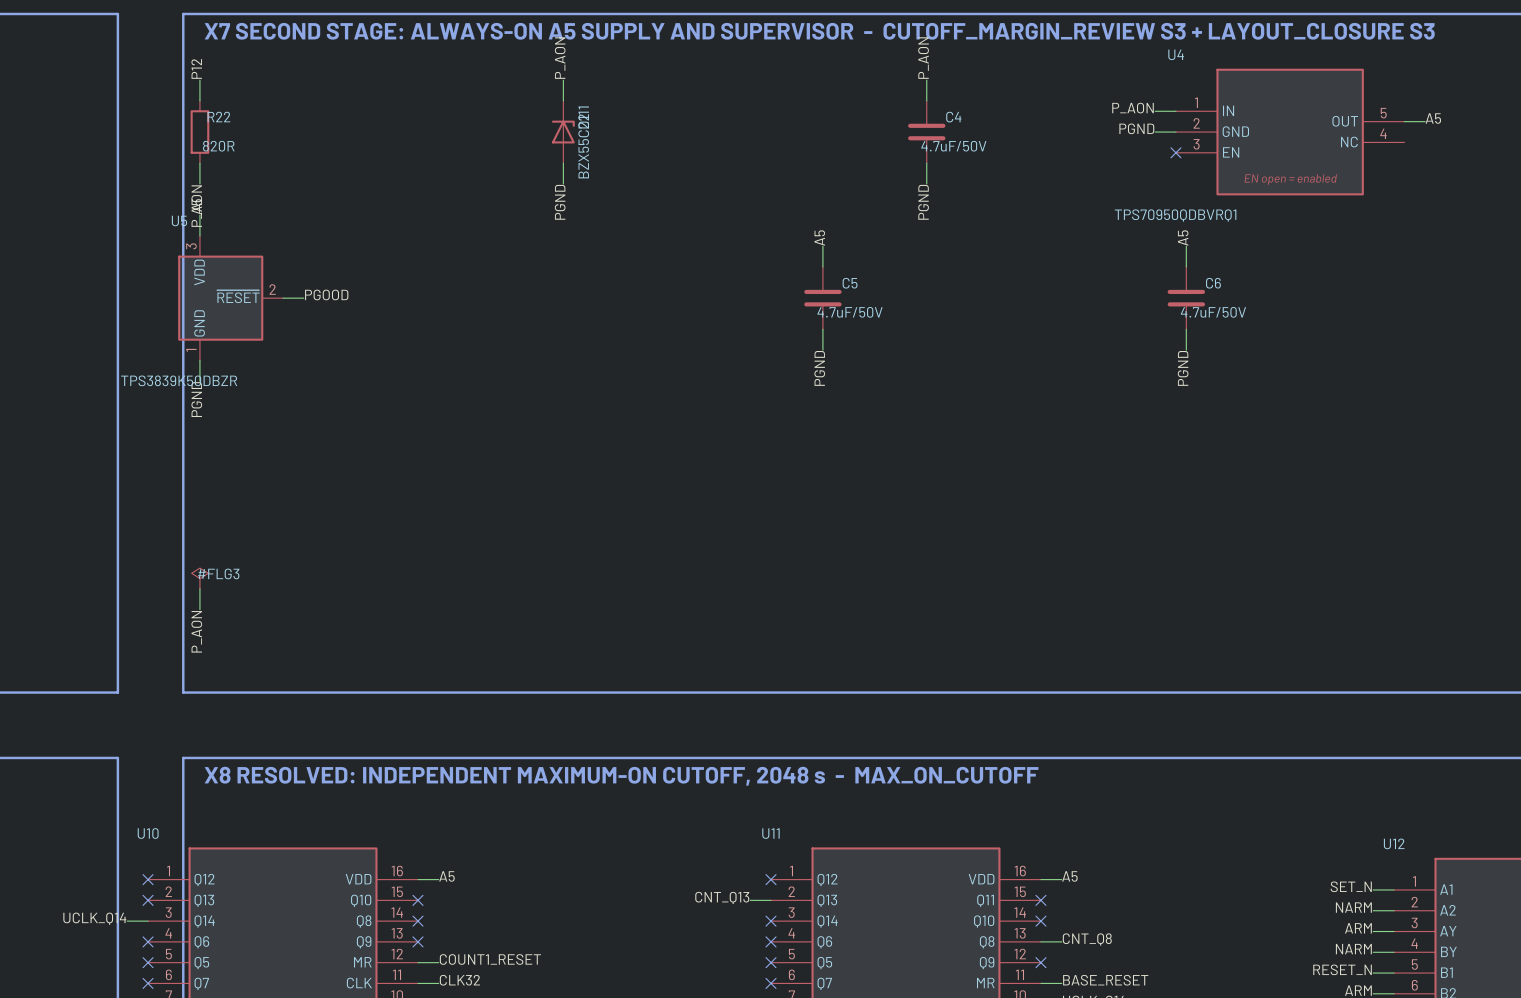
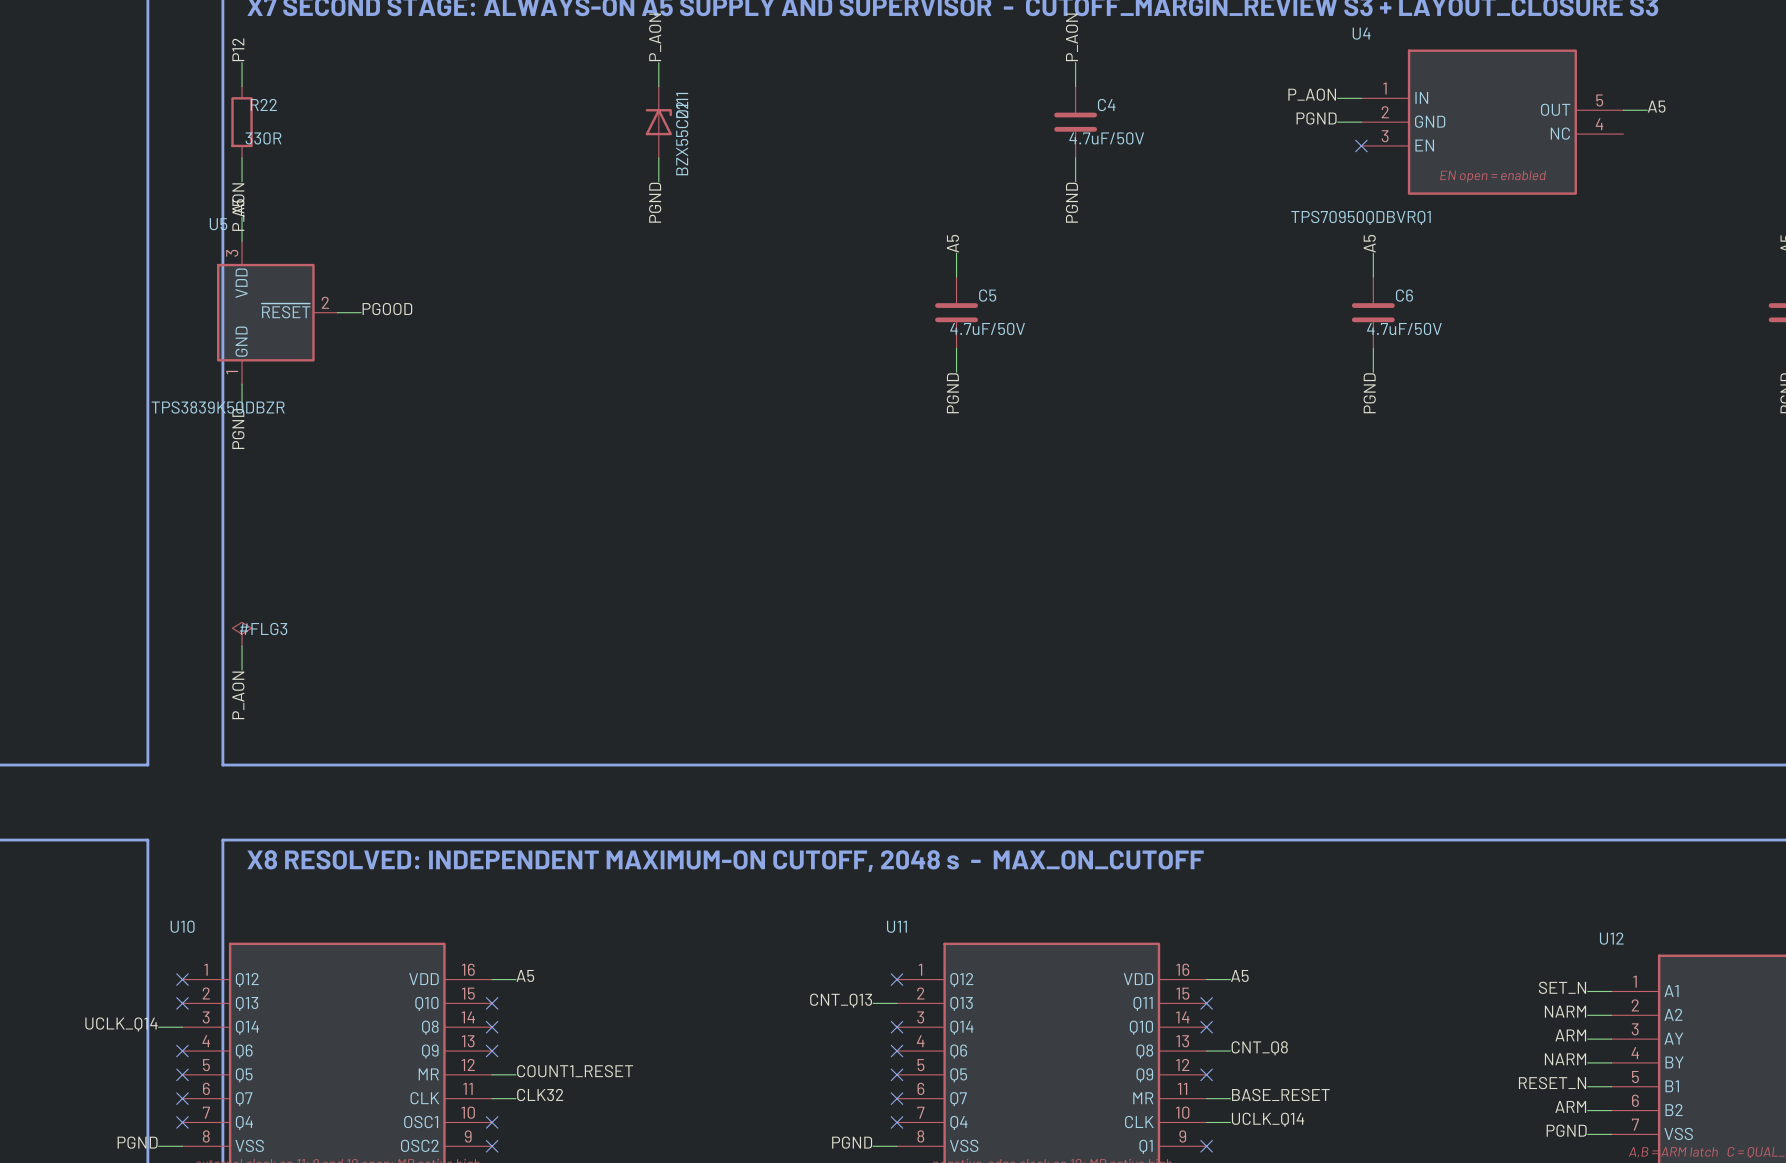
R22 value: 820R (218, 146) -> 330R (263, 138)

